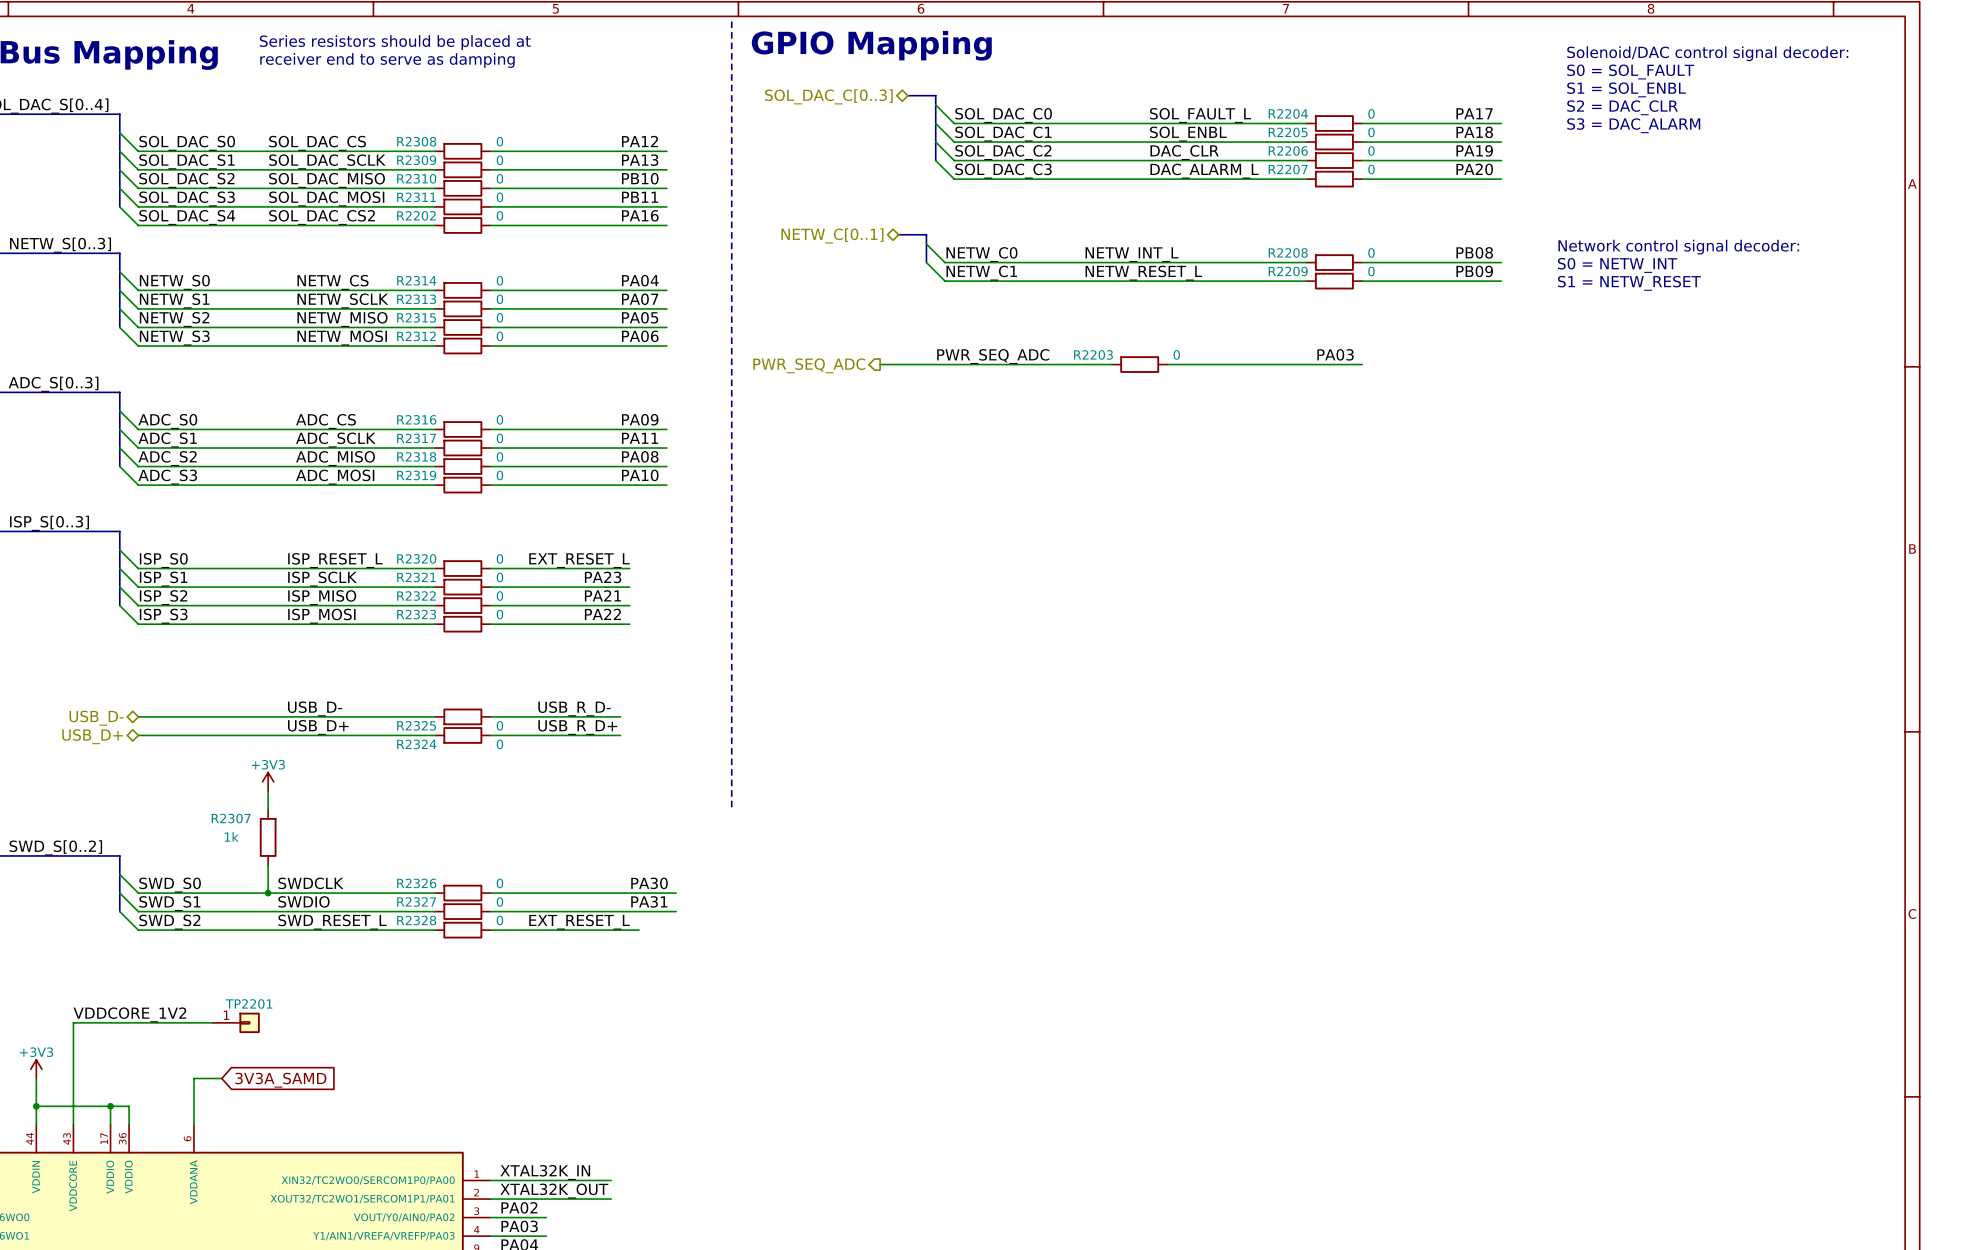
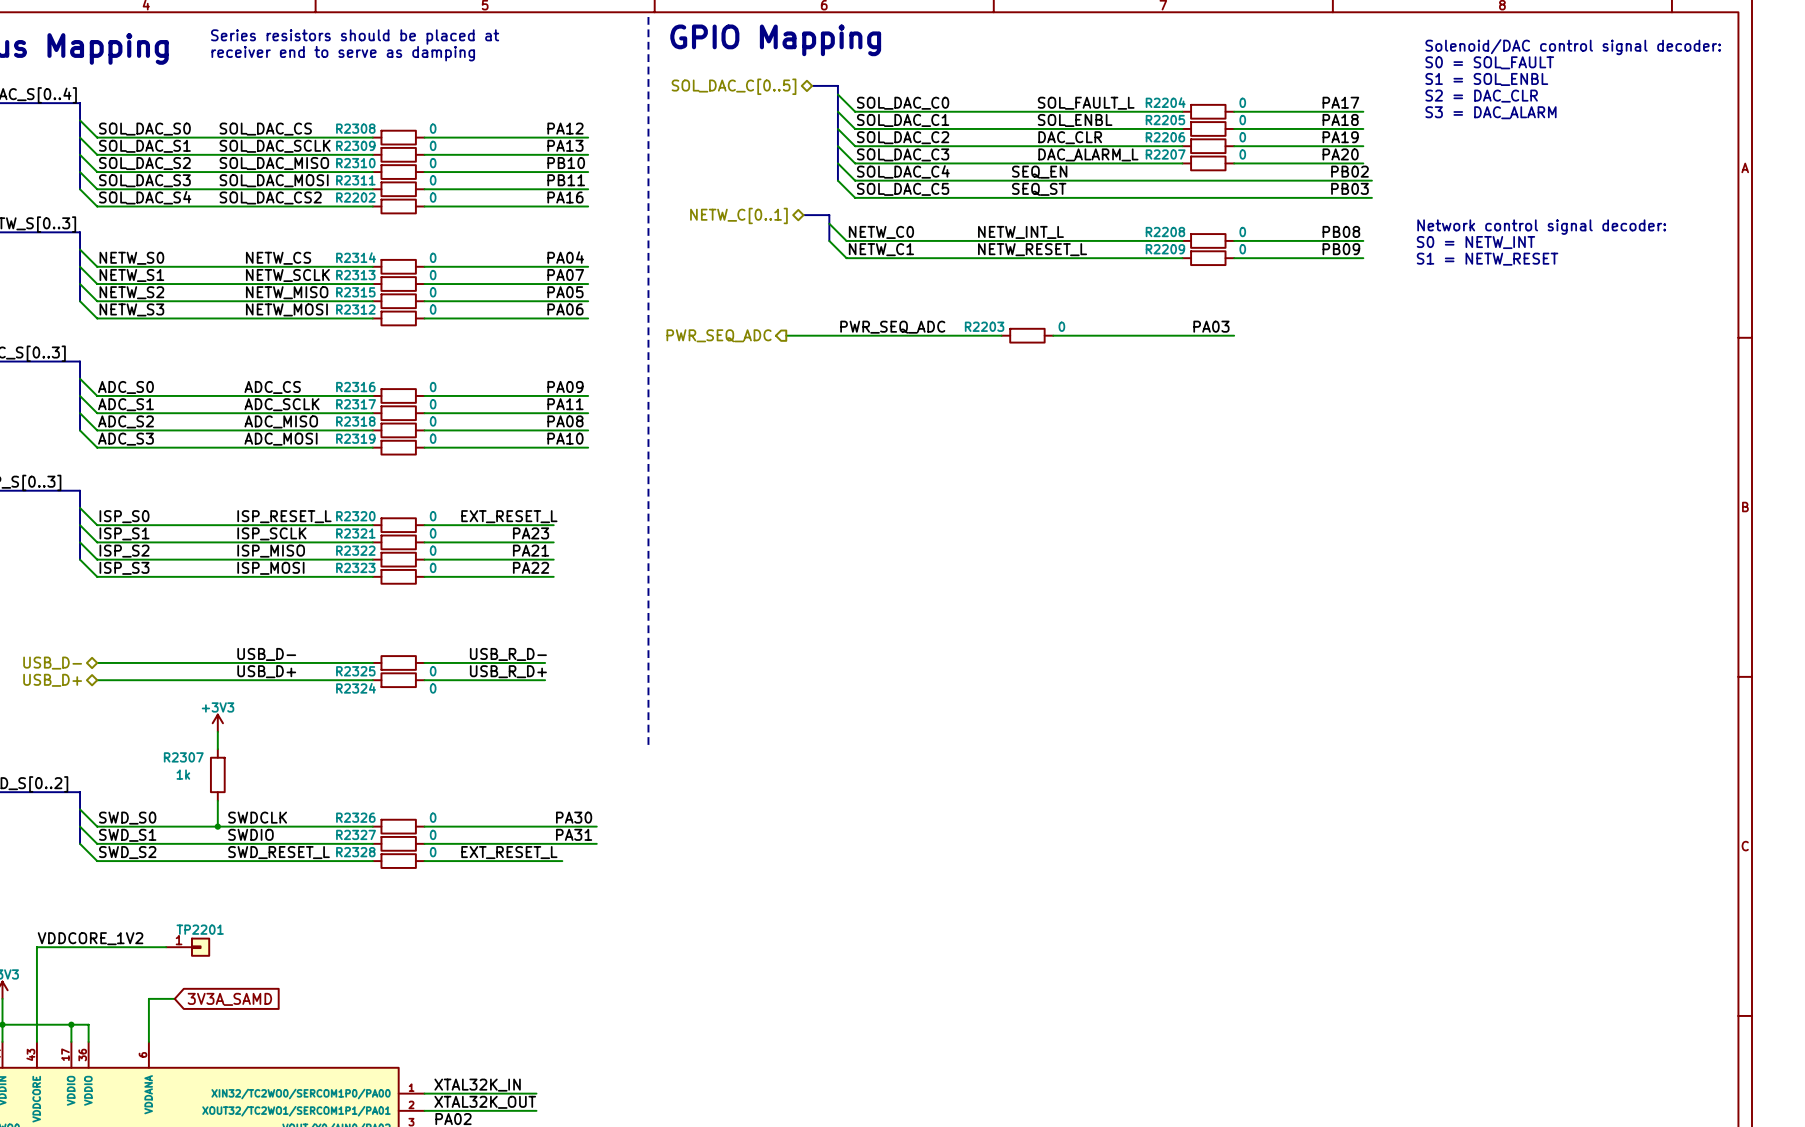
hierarchical label: SOL_DAC_C[0..3] (828, 96) -> SOL_DAC_C[0..5] (734, 86)
bus: none -> (837, 146) (837, 180)
wire: none -> (837, 163) (855, 180) (1371, 180)
label: none -> PB02 (1349, 171)
label: none -> SOL_DAC_C4 (903, 171)
label: none -> SEQ_EN (1039, 172)
wire: none -> (837, 180) (855, 197) (1371, 197)
label: none -> PB03 (1349, 188)
label: none -> SOL_DAC_C5 (903, 189)
label: none -> SEQ_ST (1039, 189)

